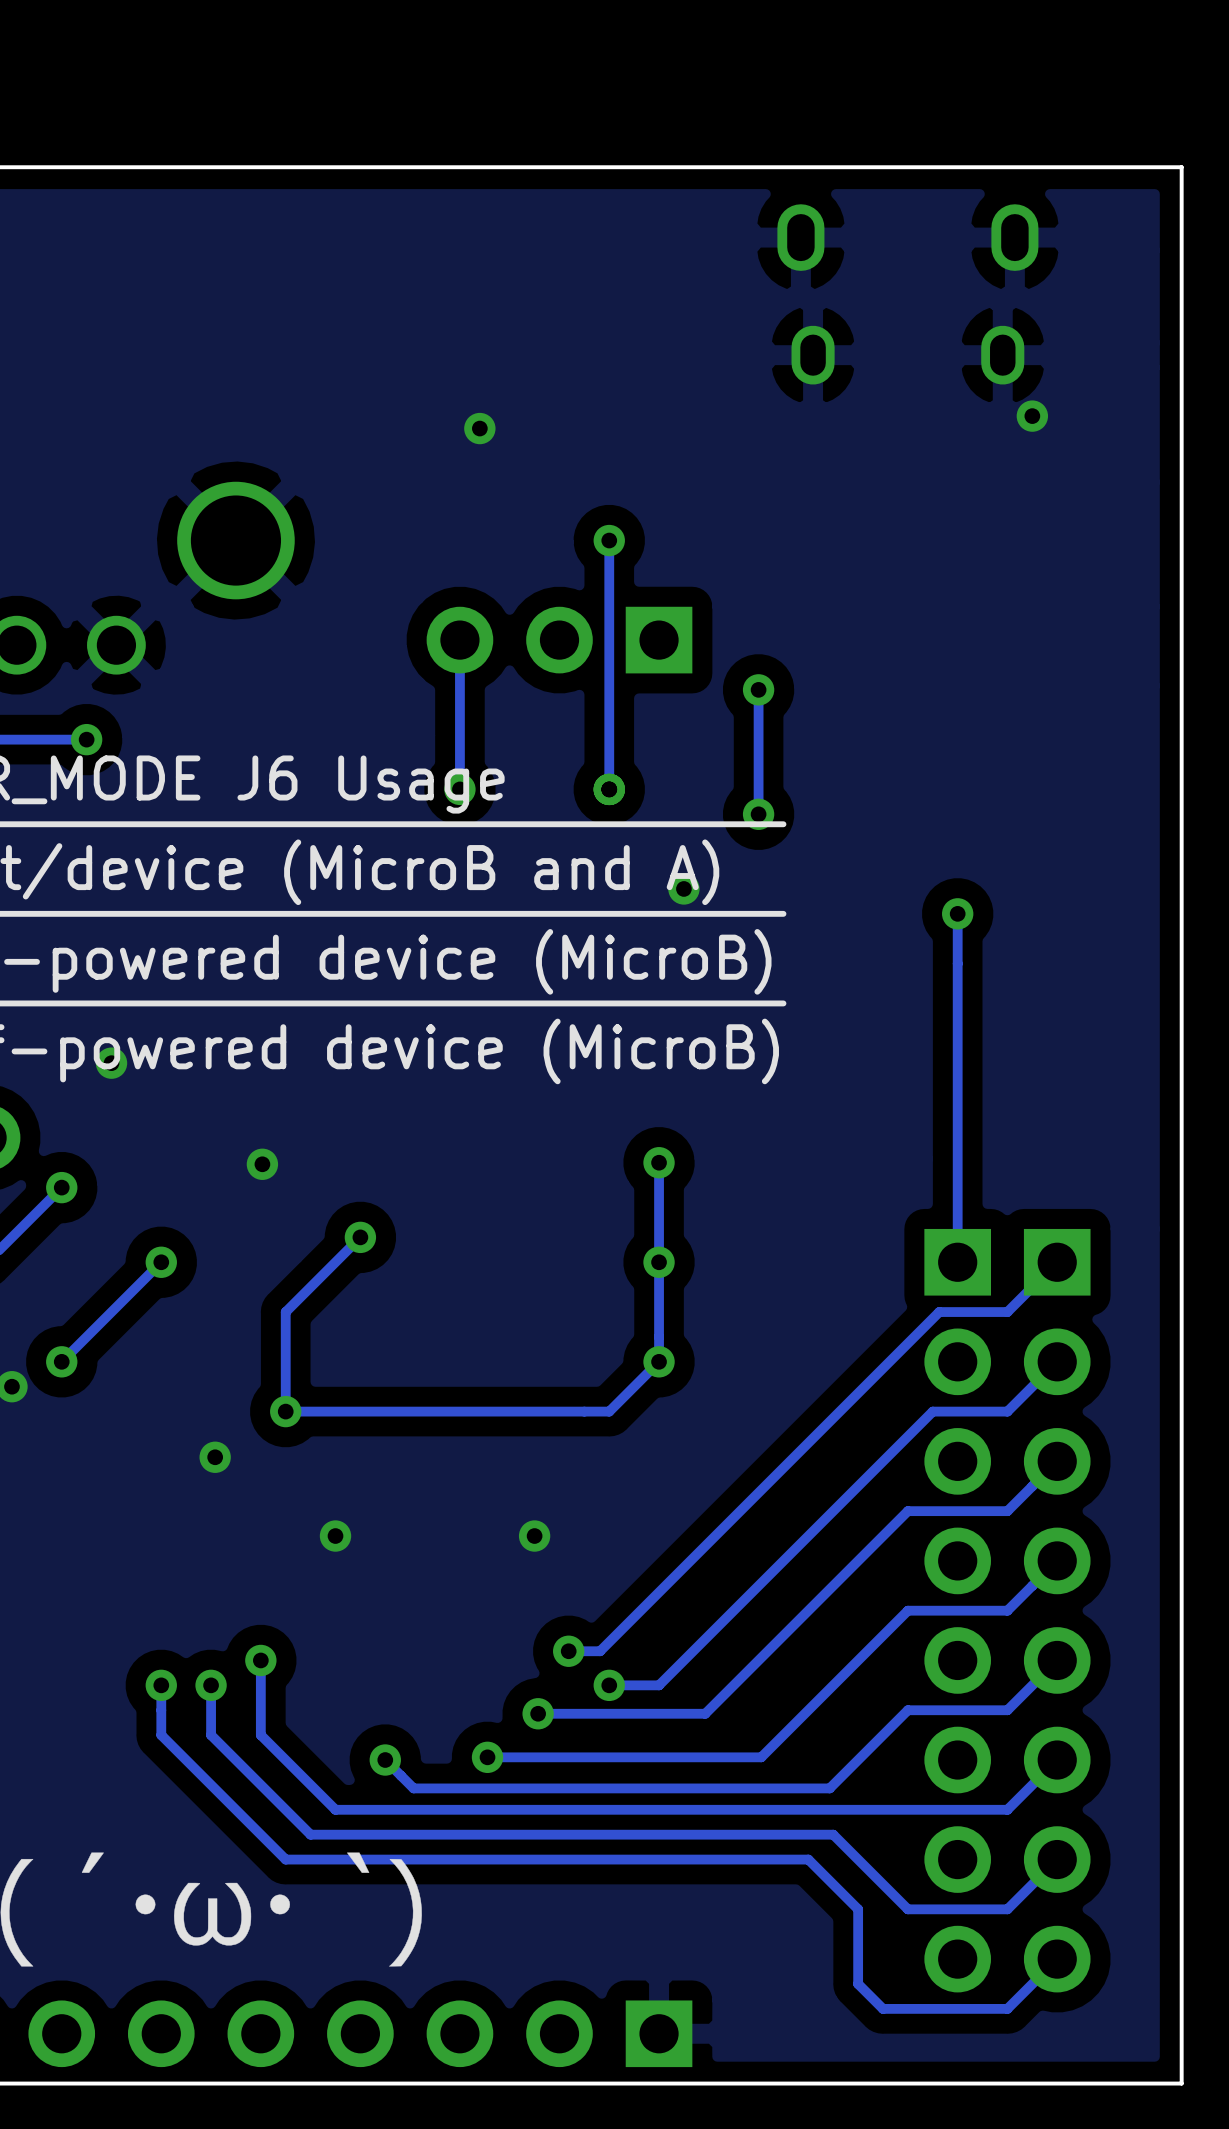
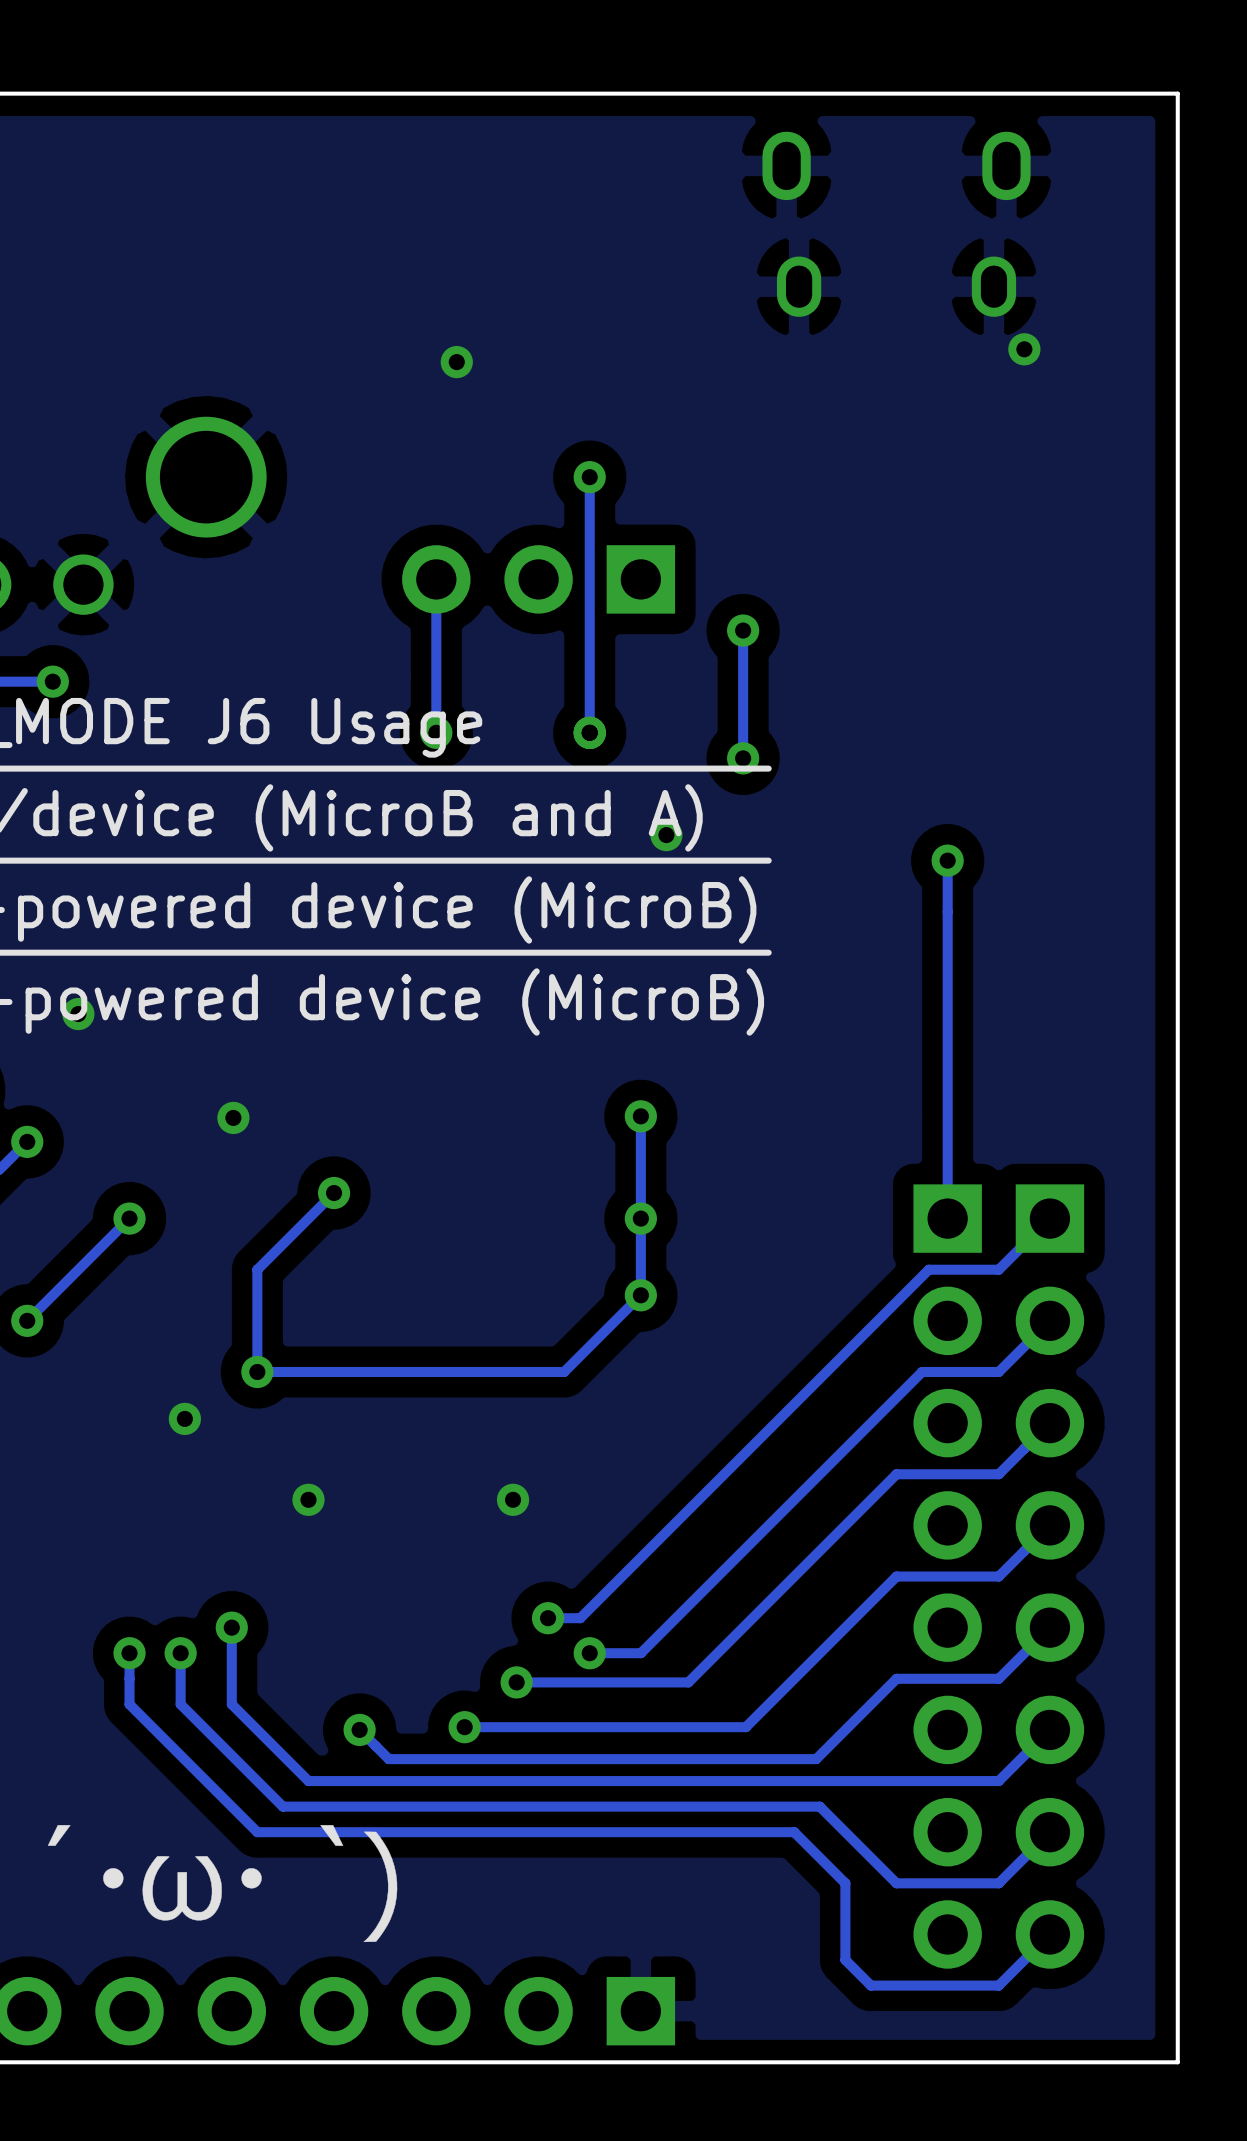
track: (659, 1336) (659, 1361) (609, 1411) (584, 1411) -> (640, 1295) (564, 1371)
via position: (659, 1361) -> (640, 1295)

